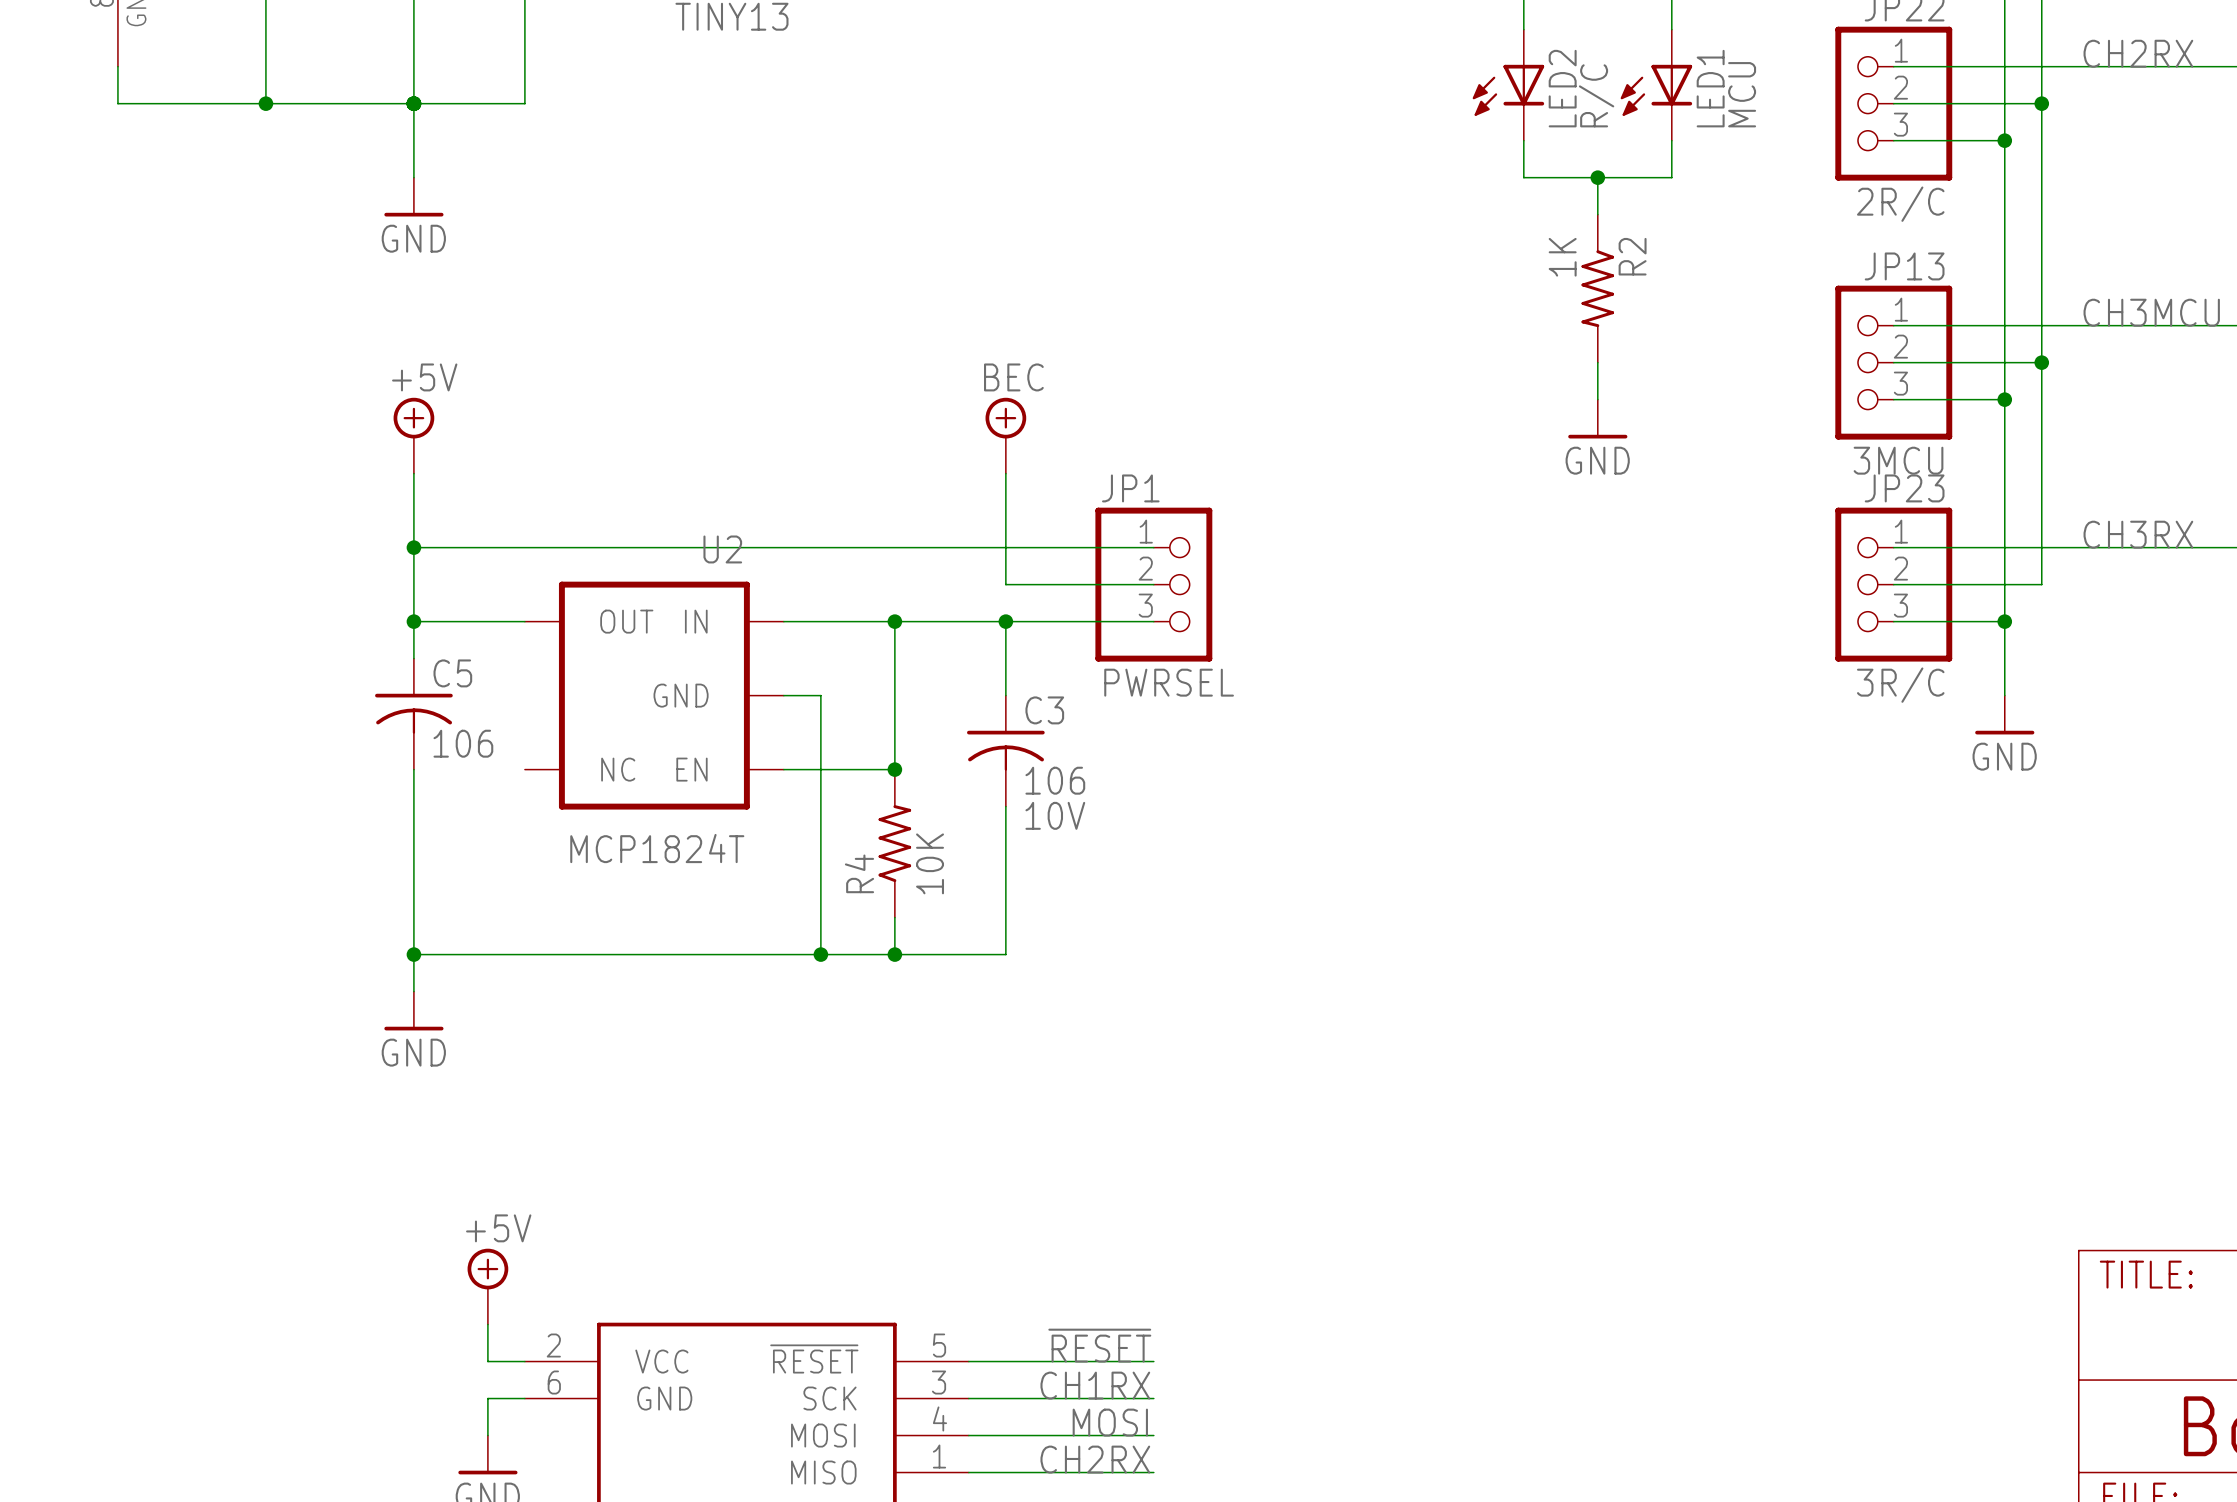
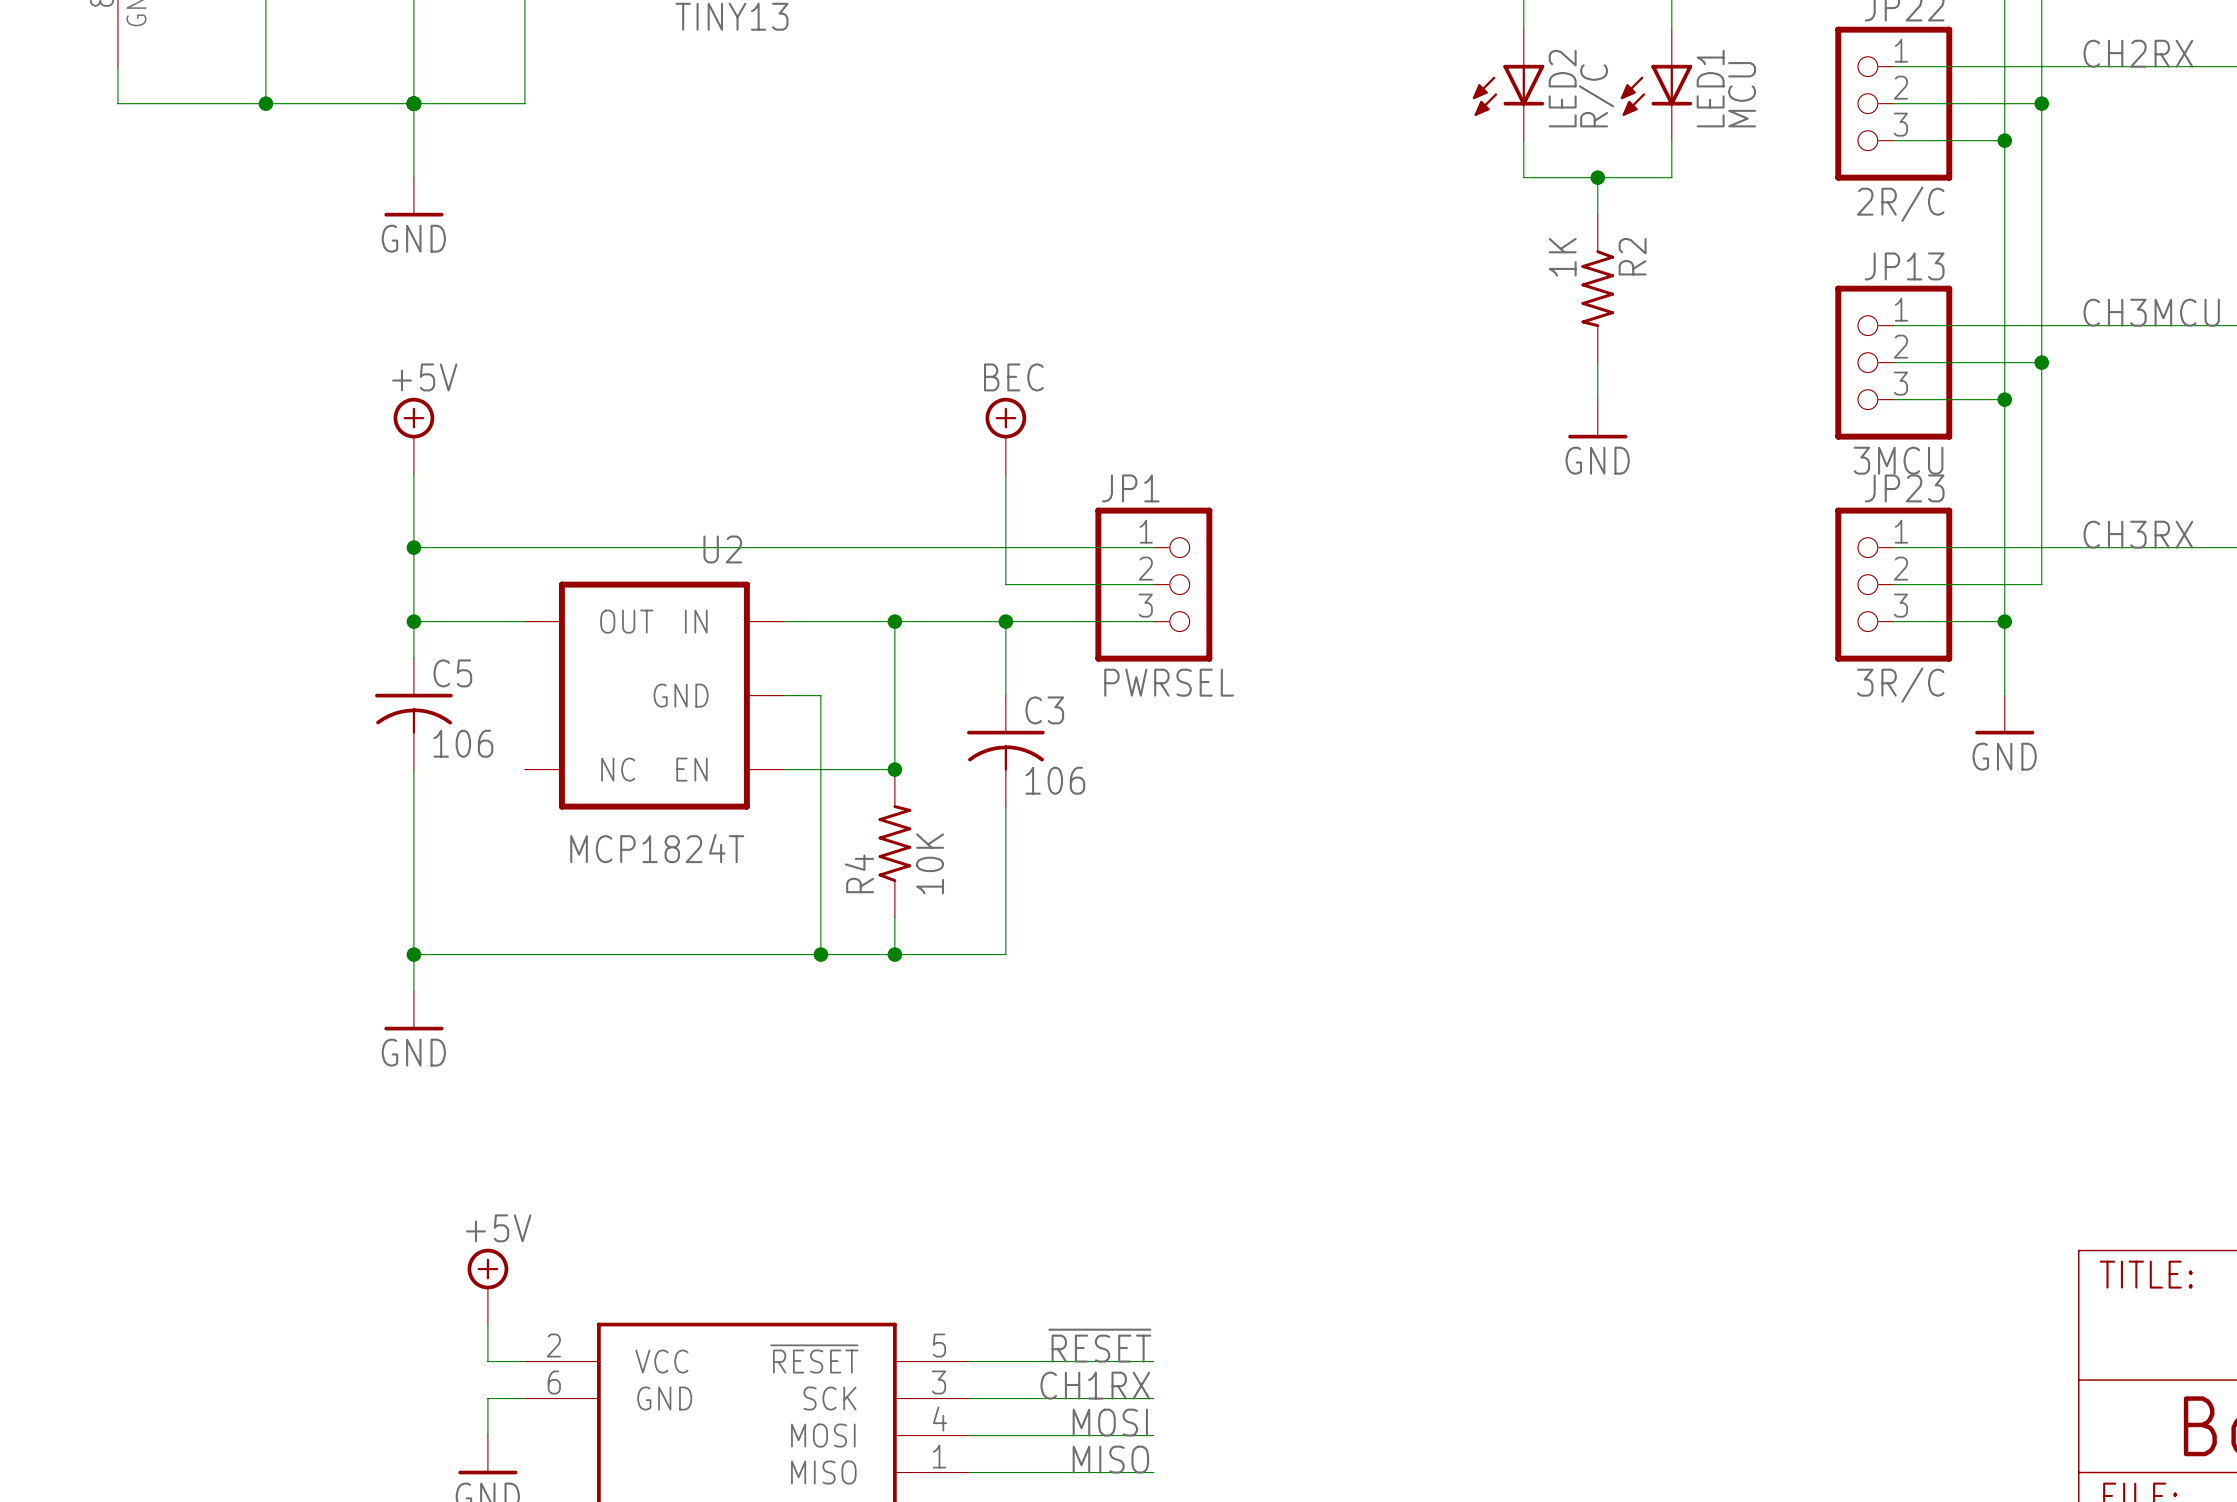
C3 text: 10V (1055, 815) -> none
label: CH2RX (1095, 1459) -> MISO (1110, 1459)

